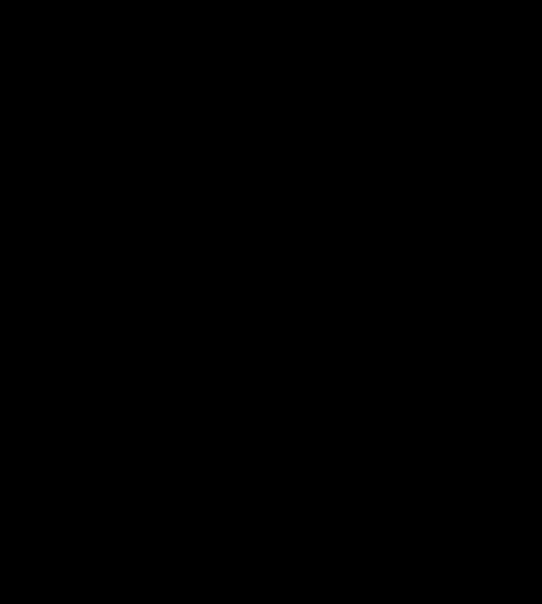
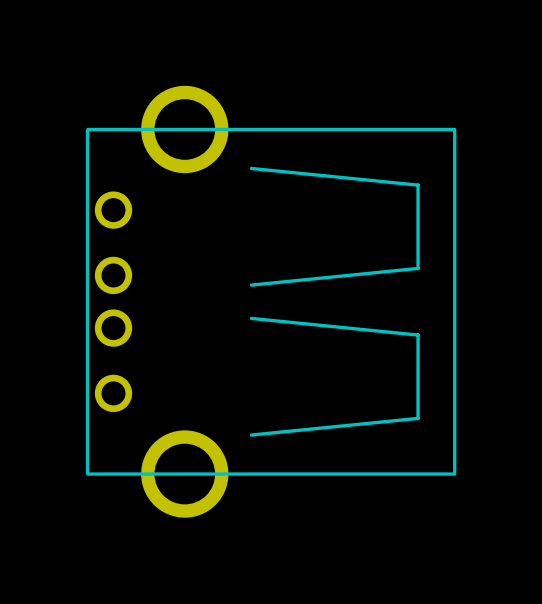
part: none -> (271, 301)

